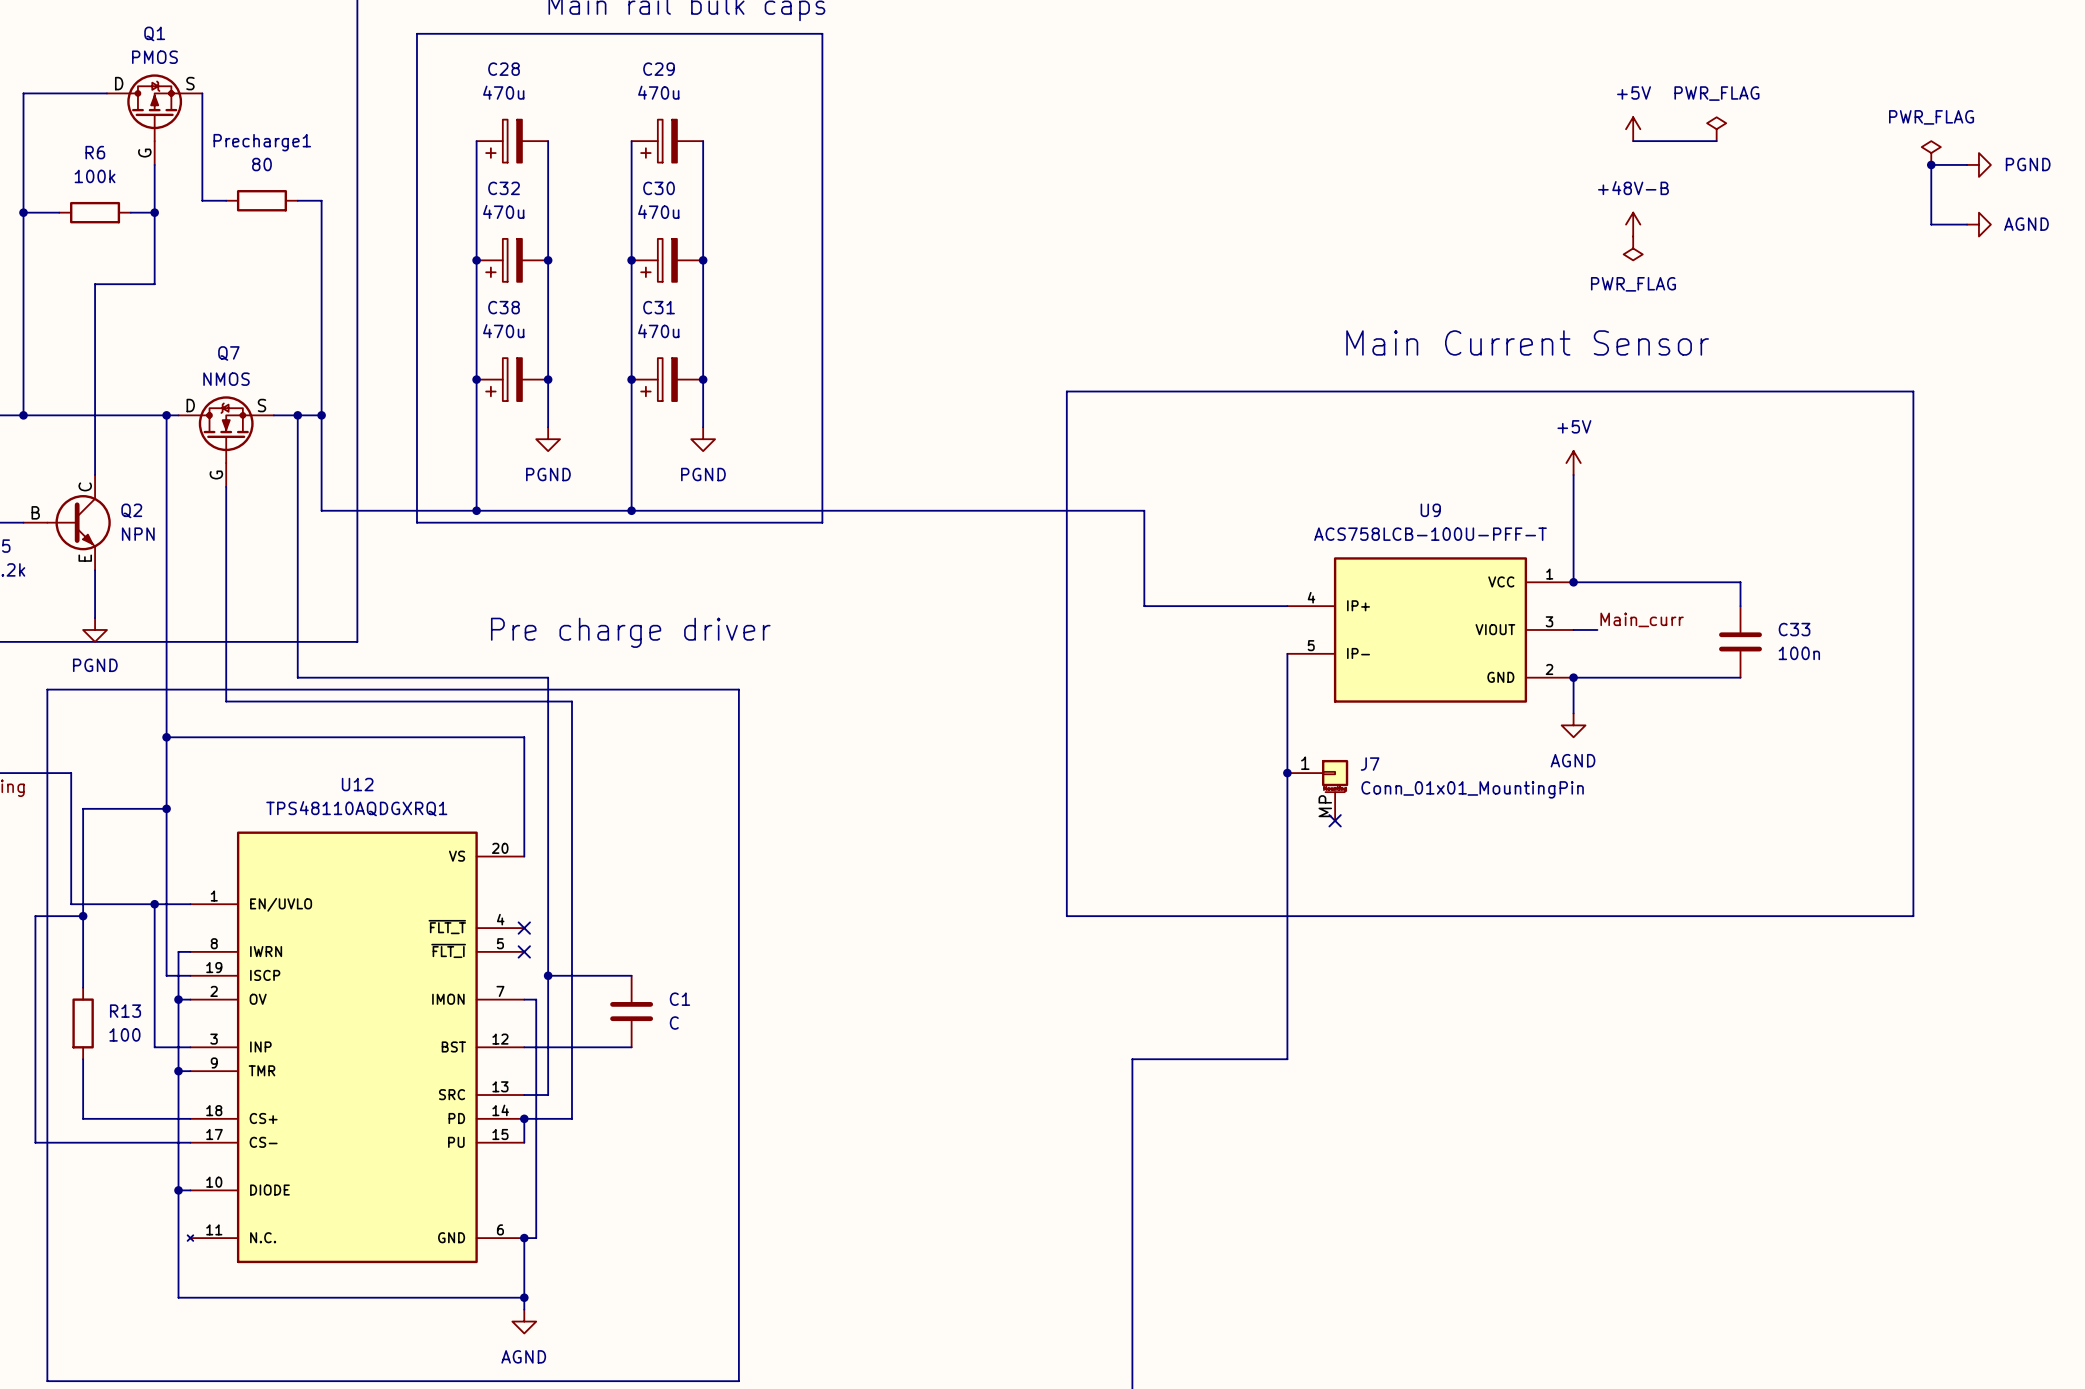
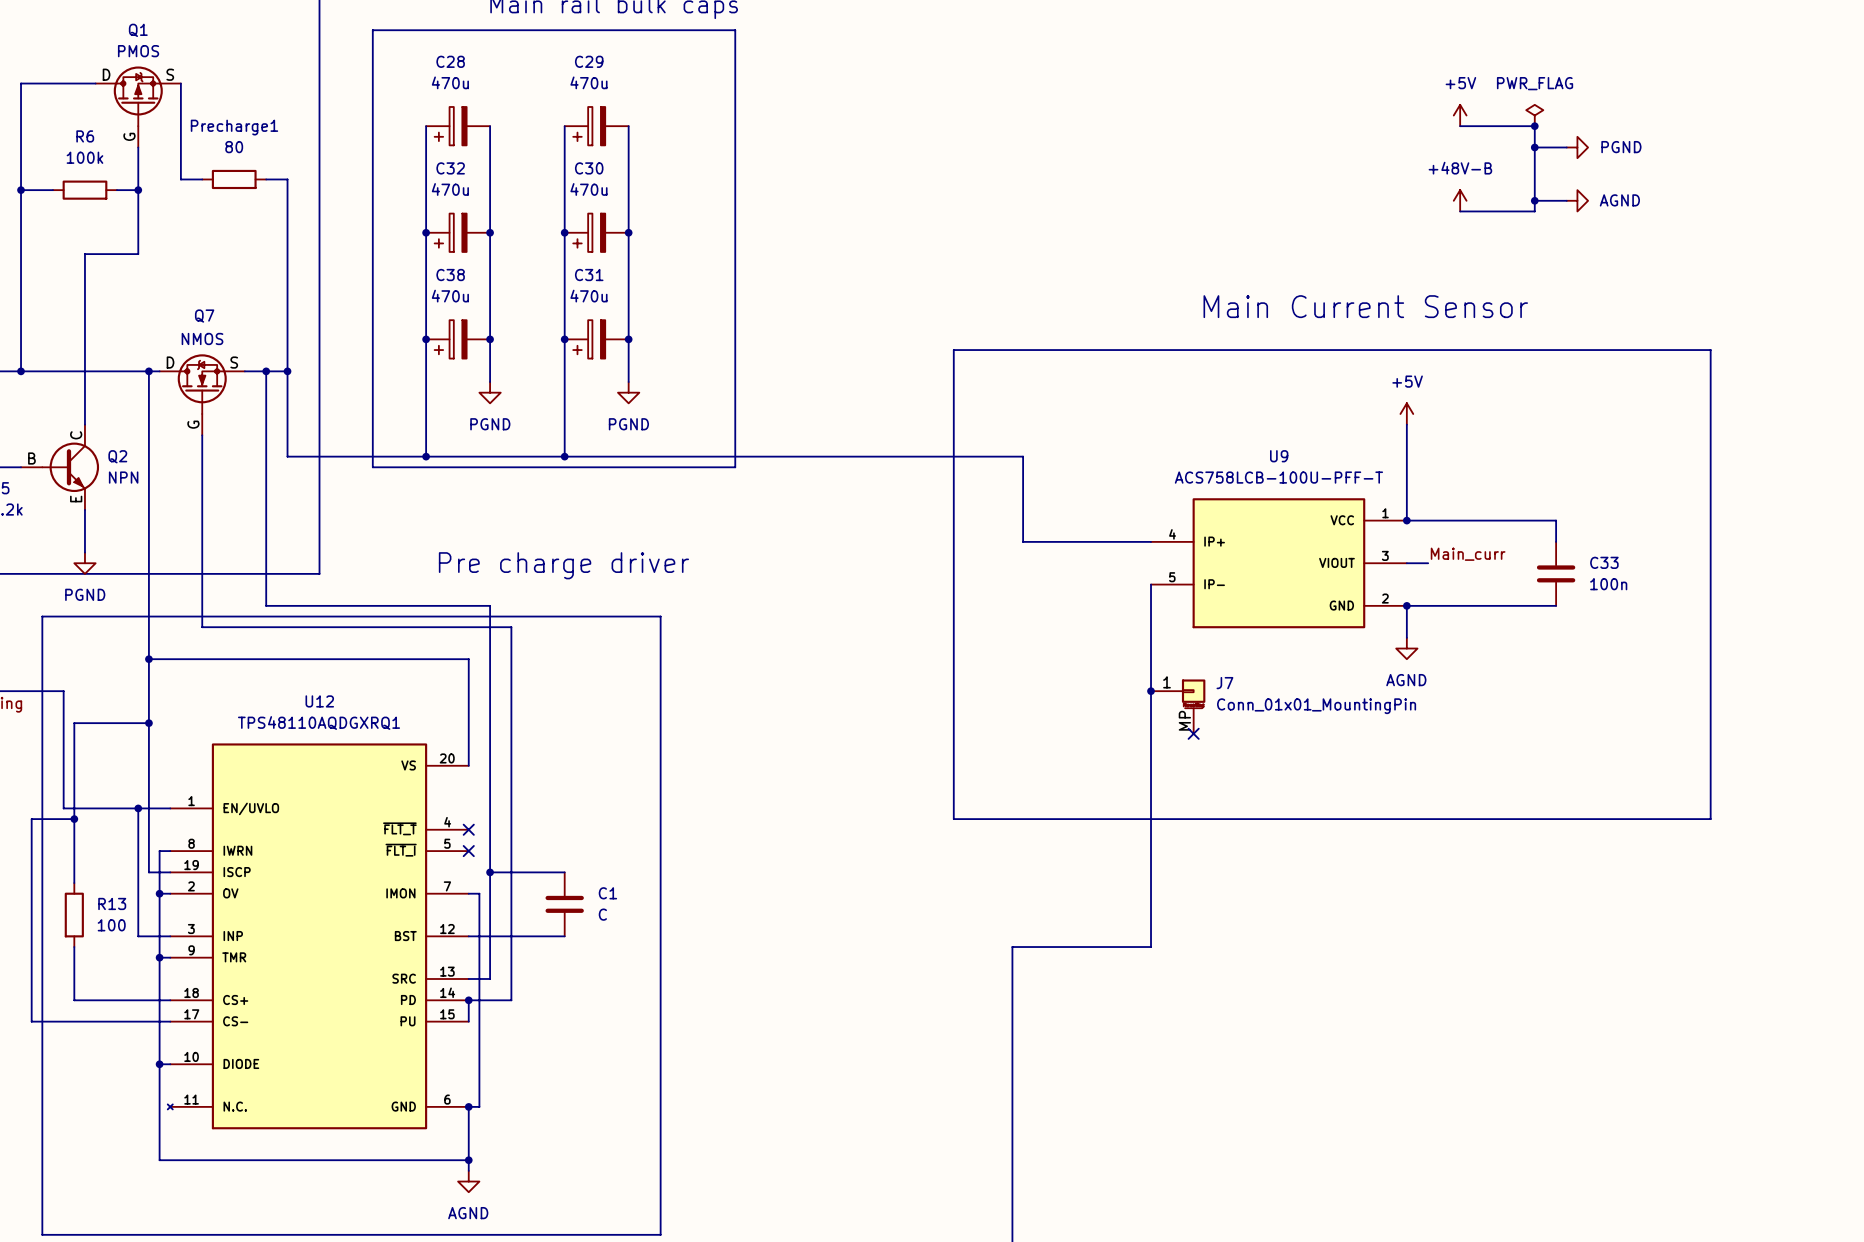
wire: none -> (1534, 126) (1534, 211) (1460, 211)
junction: none -> (1534, 126)
power symbol: PWR_FLAG (1931, 153) -> none
wire: none -> (1534, 147) (1566, 147)
junction: none -> (1534, 147)
junction: (1931, 164) -> none
wire: (1967, 164) (1931, 164) (1931, 224) (1967, 224) -> none
power symbol position: PGND (1978, 164) -> PGND (1577, 147)
wire: none -> (1534, 200) (1566, 200)
junction: none -> (1534, 200)
power symbol position: AGND (1978, 224) -> AGND (1577, 200)
power symbol: PWR_FLAG (1633, 248) -> none

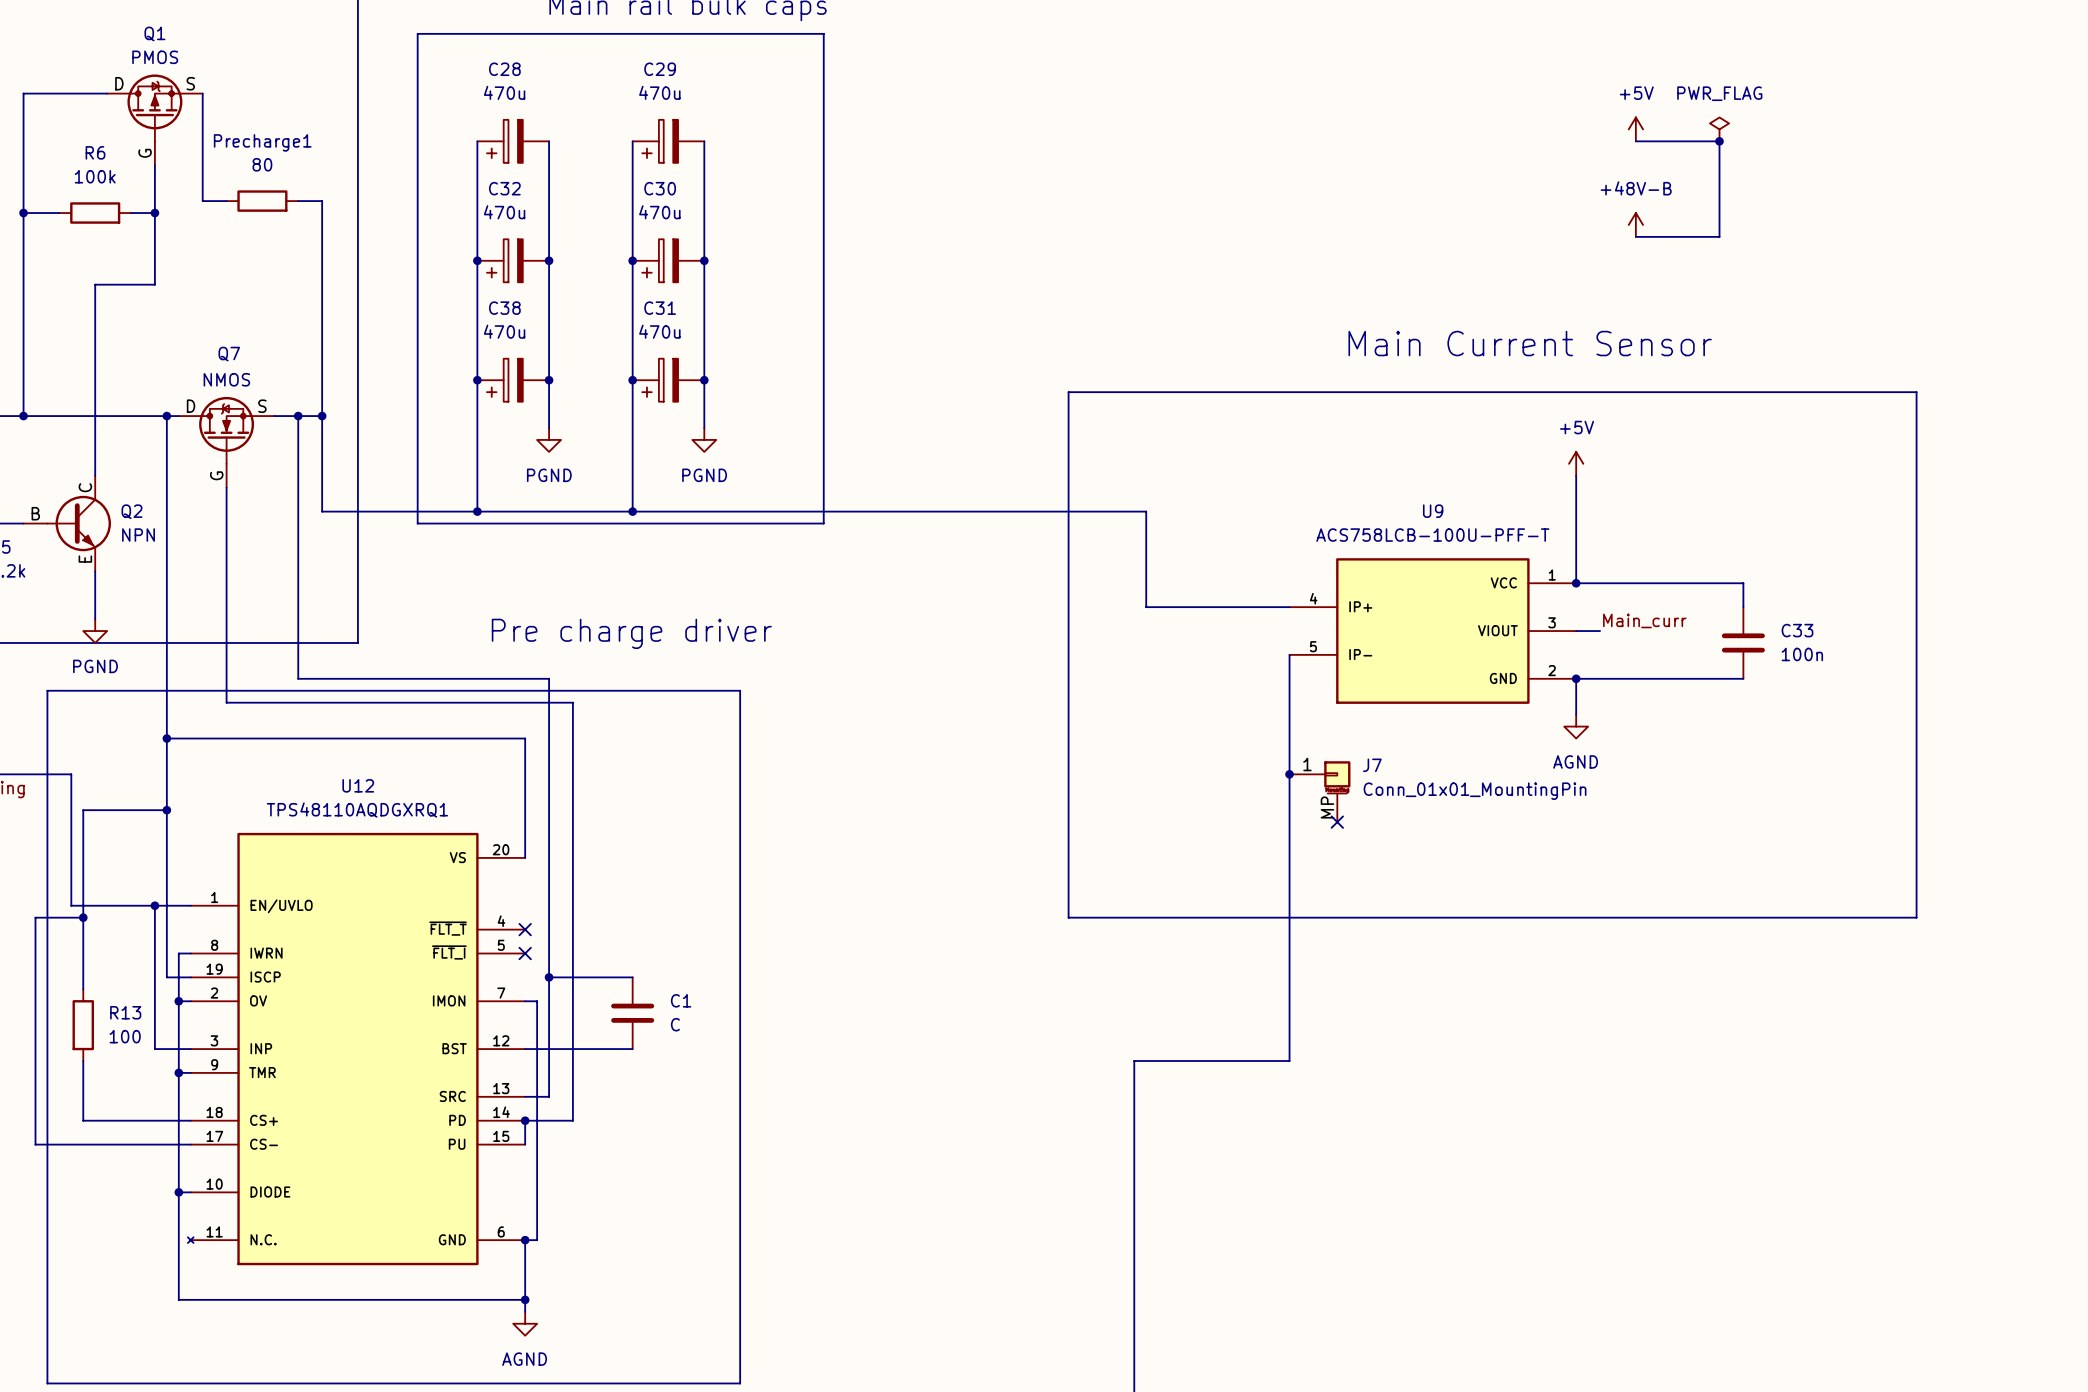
wire: (1534, 147) (1566, 147) -> none
junction: (1534, 147) -> none
power symbol: PGND (1577, 147) -> none
wire: (1534, 200) (1566, 200) -> none
junction: (1534, 200) -> none
power symbol: AGND (1577, 200) -> none

